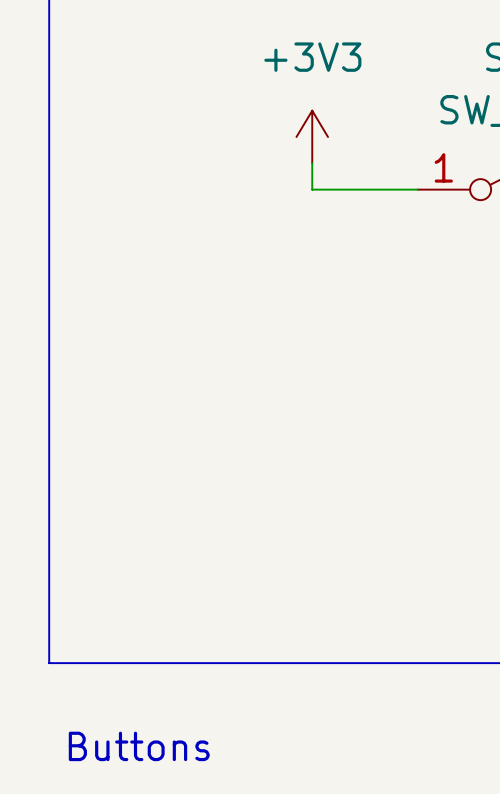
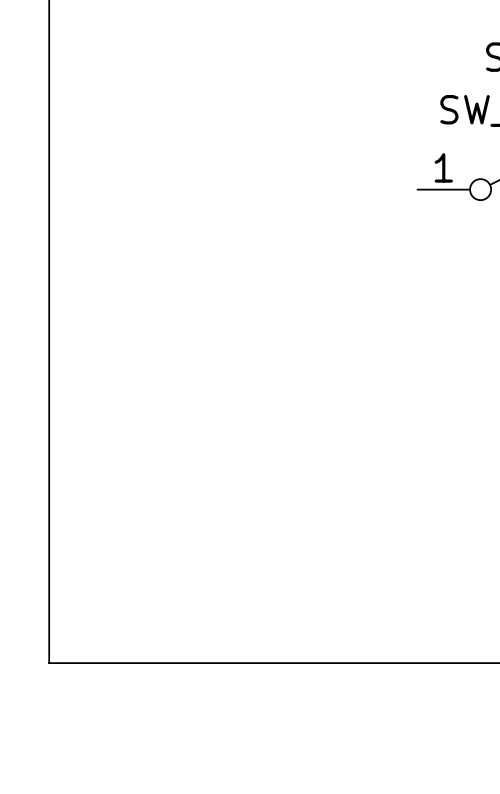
power symbol: +3V3 (312, 137) -> none
wire: (312, 163) (312, 189) (417, 189) -> none
text: Buttons (139, 746) -> none

